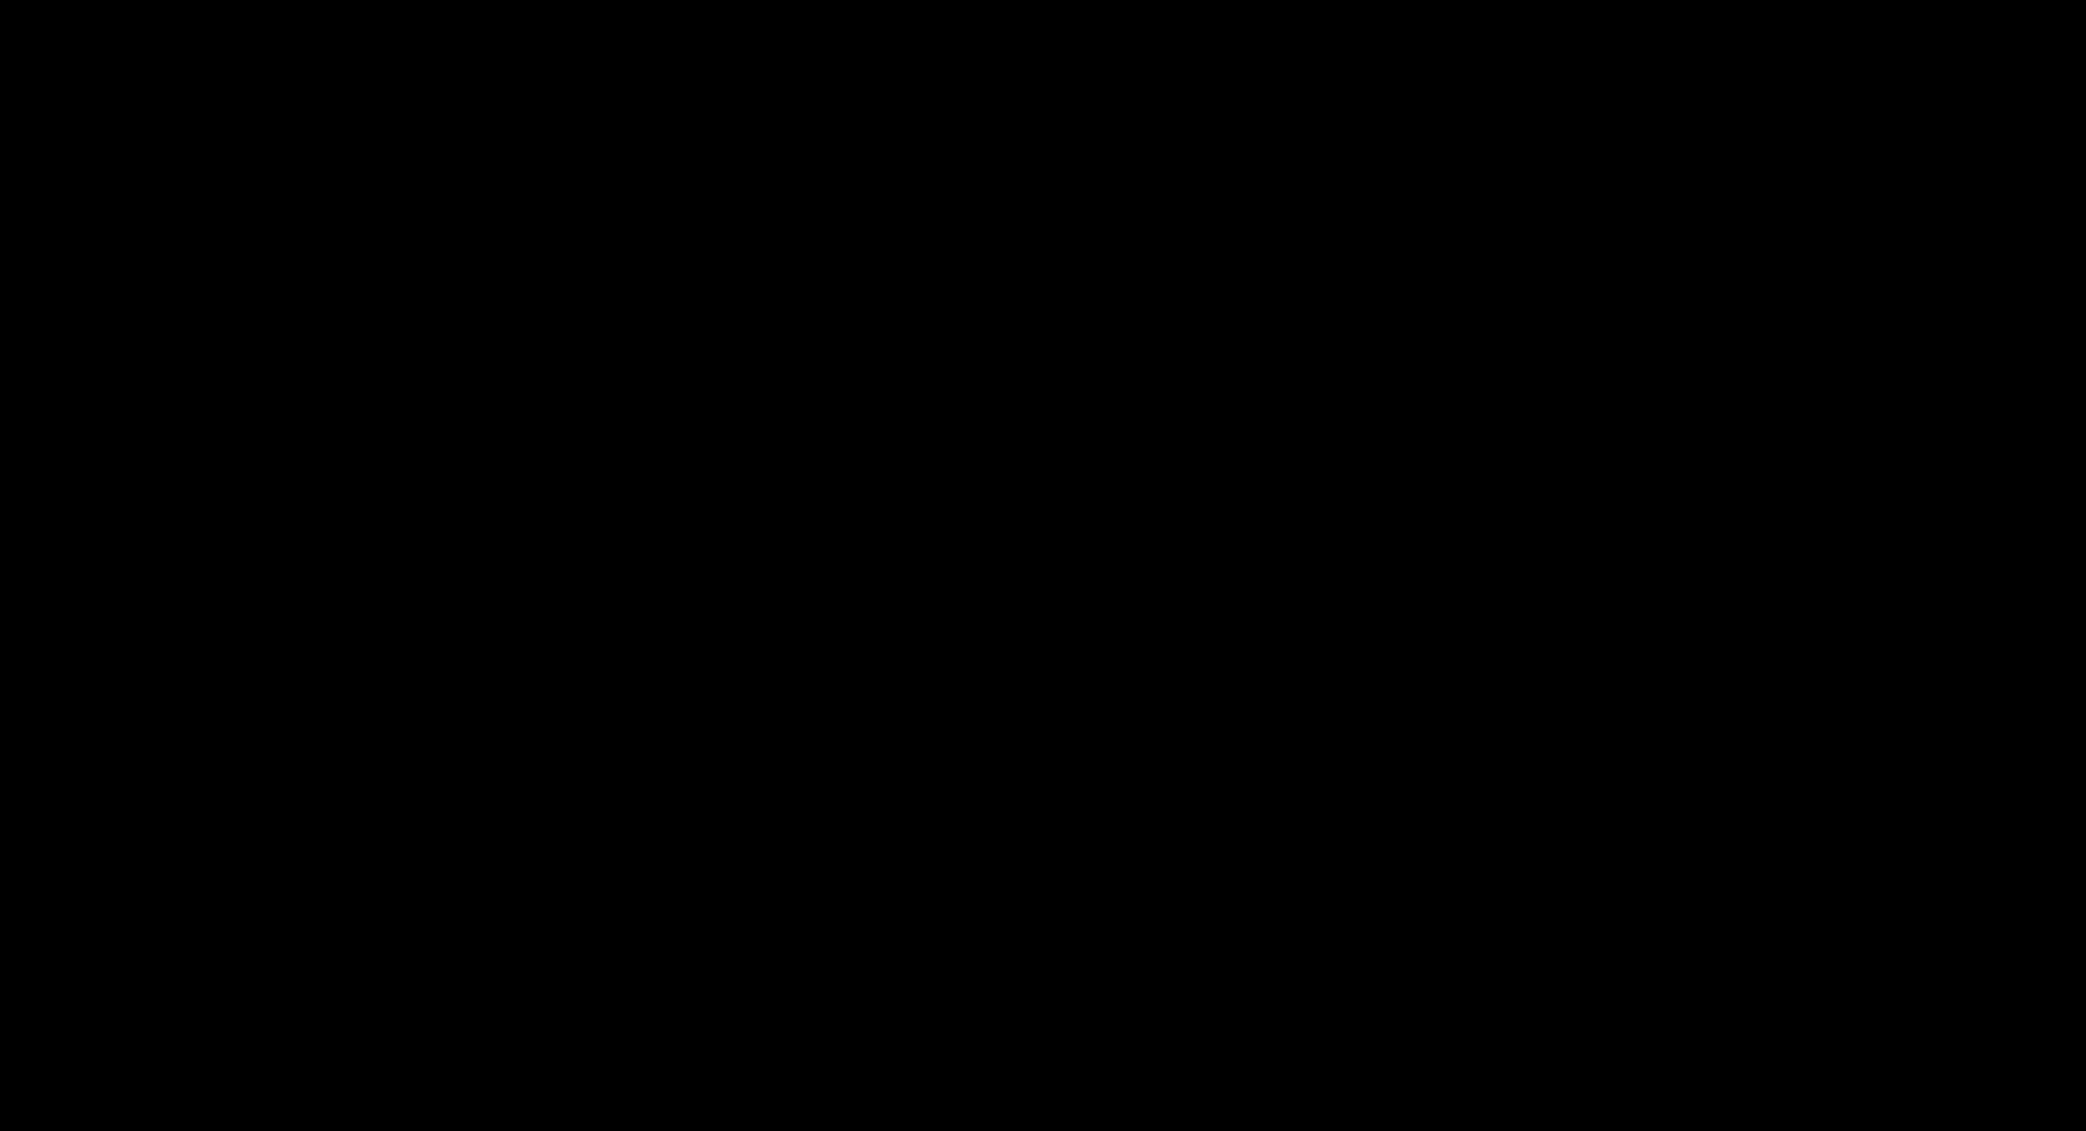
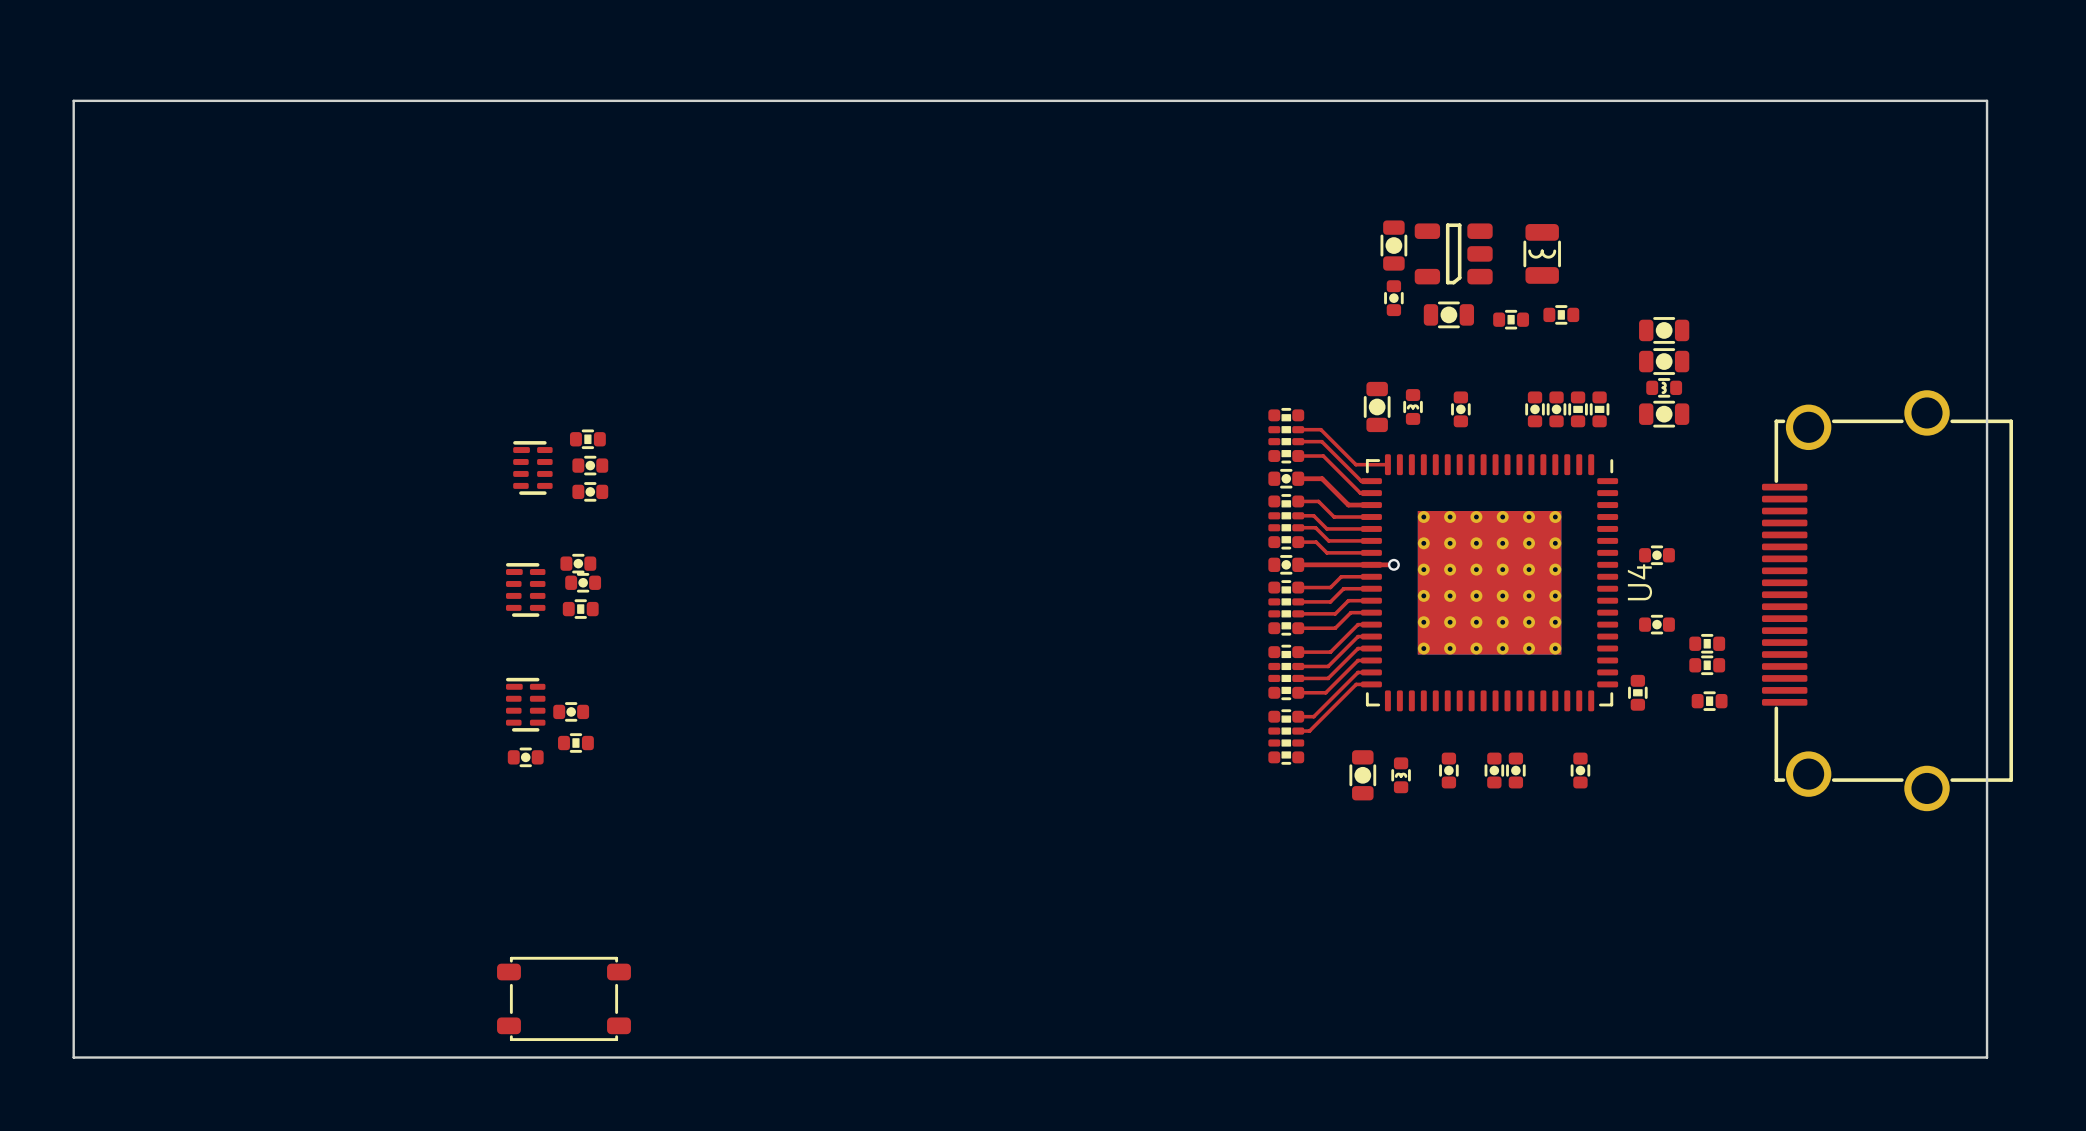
board edge: none -> (73, 100) (1987, 100) (1987, 1057) (73, 1057) (73, 100)
part: none -> (1393, 245)
part: none -> (1453, 253)
part: none -> (1542, 253)
part: none -> (1393, 298)
part: none -> (1448, 314)
part: none -> (1561, 314)
part: none -> (1511, 319)
part: none -> (1664, 330)
part: none -> (1664, 361)
part: none -> (1664, 387)
part: none -> (1377, 406)
part: none -> (1413, 406)
part: none -> (1460, 409)
part: none -> (1535, 409)
part: none -> (1556, 409)
part: none -> (1578, 409)
part: none -> (1599, 409)
part: none -> (1664, 414)
top track: none -> (1298, 429) (1320, 429) (1355, 464) (1387, 464)
part: none -> (1286, 435)
part: none -> (587, 439)
top track: none -> (1298, 441) (1321, 441) (1361, 481) (1371, 481)
top track: none -> (1298, 456) (1323, 456) (1360, 493) (1371, 493)
part: none -> (590, 465)
part: none -> (532, 467)
part: none -> (1286, 478)
top track: none -> (1298, 478) (1322, 478) (1348, 505) (1371, 505)
part: none -> (590, 491)
top track: none -> (1298, 501) (1318, 501) (1334, 517) (1371, 517)
top track: none -> (1298, 515) (1313, 515) (1326, 528) (1371, 528)
part: none -> (1286, 521)
top track: none -> (1298, 527) (1315, 527) (1328, 540) (1371, 540)
top track: none -> (1298, 542) (1316, 542) (1326, 552) (1371, 552)
part: none -> (1656, 555)
part: none -> (578, 563)
part: none -> (1286, 564)
top track: none -> (1298, 564) (1393, 564)
via: none -> (1393, 564)
top track: none -> (1371, 576) (1341, 576) (1330, 587) (1298, 587)
part: none -> (583, 582)
U4: none -> (1489, 582)
top track: none -> (1371, 588) (1343, 588) (1330, 601) (1298, 601)
part: none -> (525, 589)
top track: none -> (1371, 600) (1348, 600) (1335, 613) (1298, 613)
part: none -> (1887, 600)
part: none -> (1286, 607)
part: none -> (580, 609)
top track: none -> (1371, 612) (1350, 612) (1335, 628) (1298, 628)
top track: none -> (1371, 624) (1358, 624) (1330, 652) (1298, 652)
part: none -> (1656, 624)
top track: none -> (1371, 636) (1358, 636) (1328, 666) (1298, 666)
part: none -> (1707, 643)
top track: none -> (1371, 648) (1358, 648) (1328, 678) (1298, 678)
top track: none -> (1371, 660) (1358, 660) (1325, 692) (1298, 692)
part: none -> (1707, 665)
part: none -> (1286, 672)
top track: none -> (1371, 672) (1358, 672) (1313, 716) (1298, 716)
top track: none -> (1371, 684) (1356, 684) (1309, 731) (1298, 731)
part: none -> (1637, 692)
part: none -> (1709, 701)
part: none -> (525, 704)
part: none -> (571, 711)
part: none -> (1286, 737)
part: none -> (575, 743)
part: none -> (525, 757)
part: none -> (1448, 770)
part: none -> (1494, 770)
part: none -> (1515, 770)
part: none -> (1580, 770)
part: none -> (1362, 775)
part: none -> (1401, 775)
part: none -> (563, 998)

